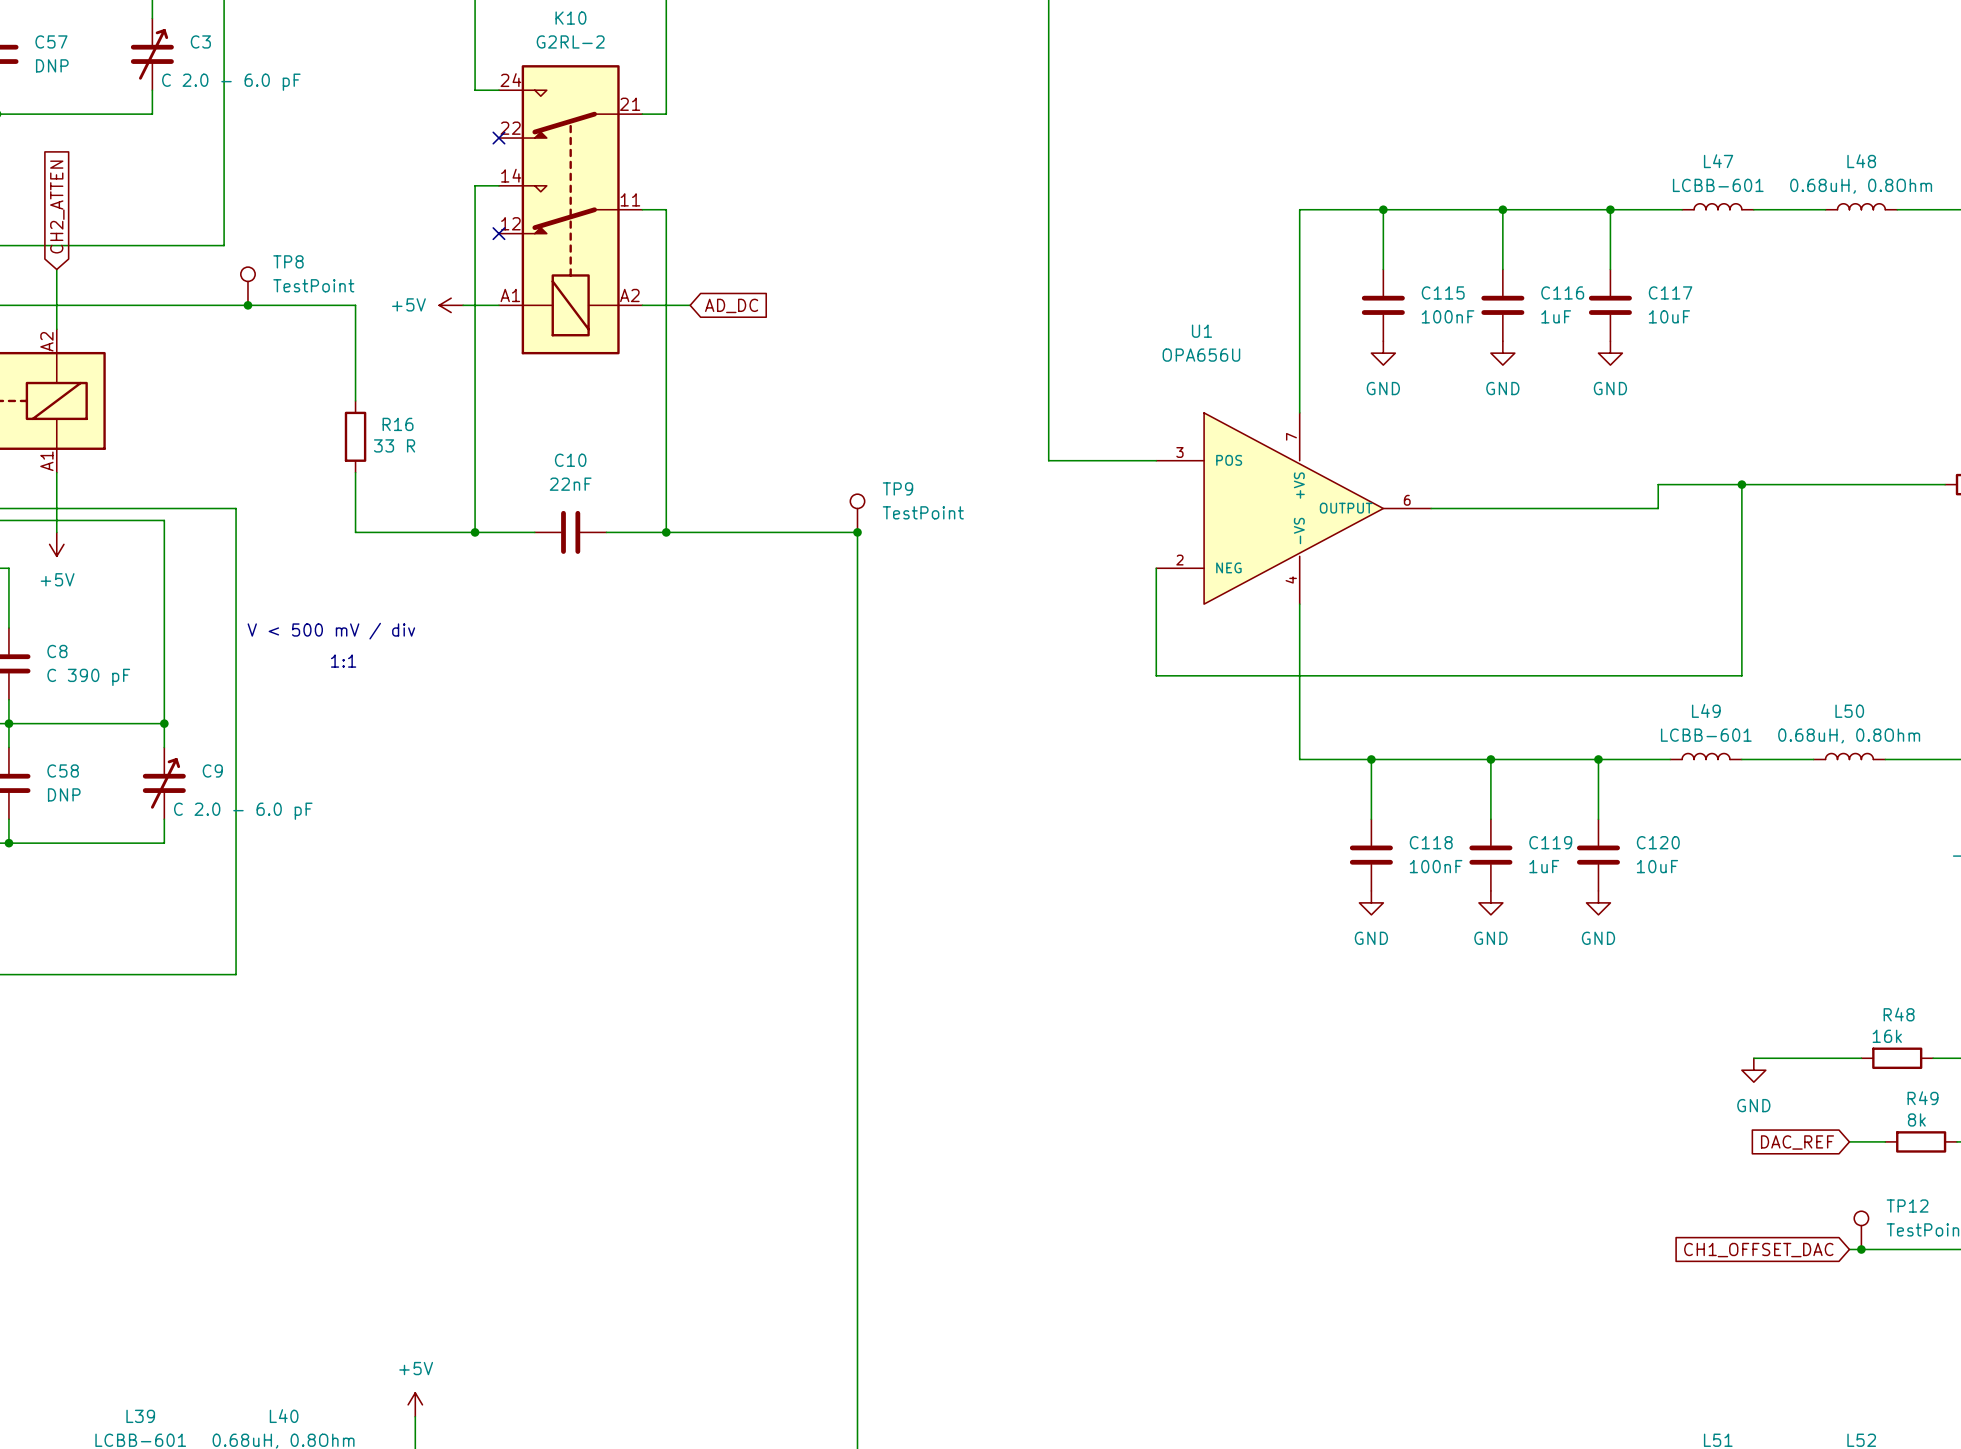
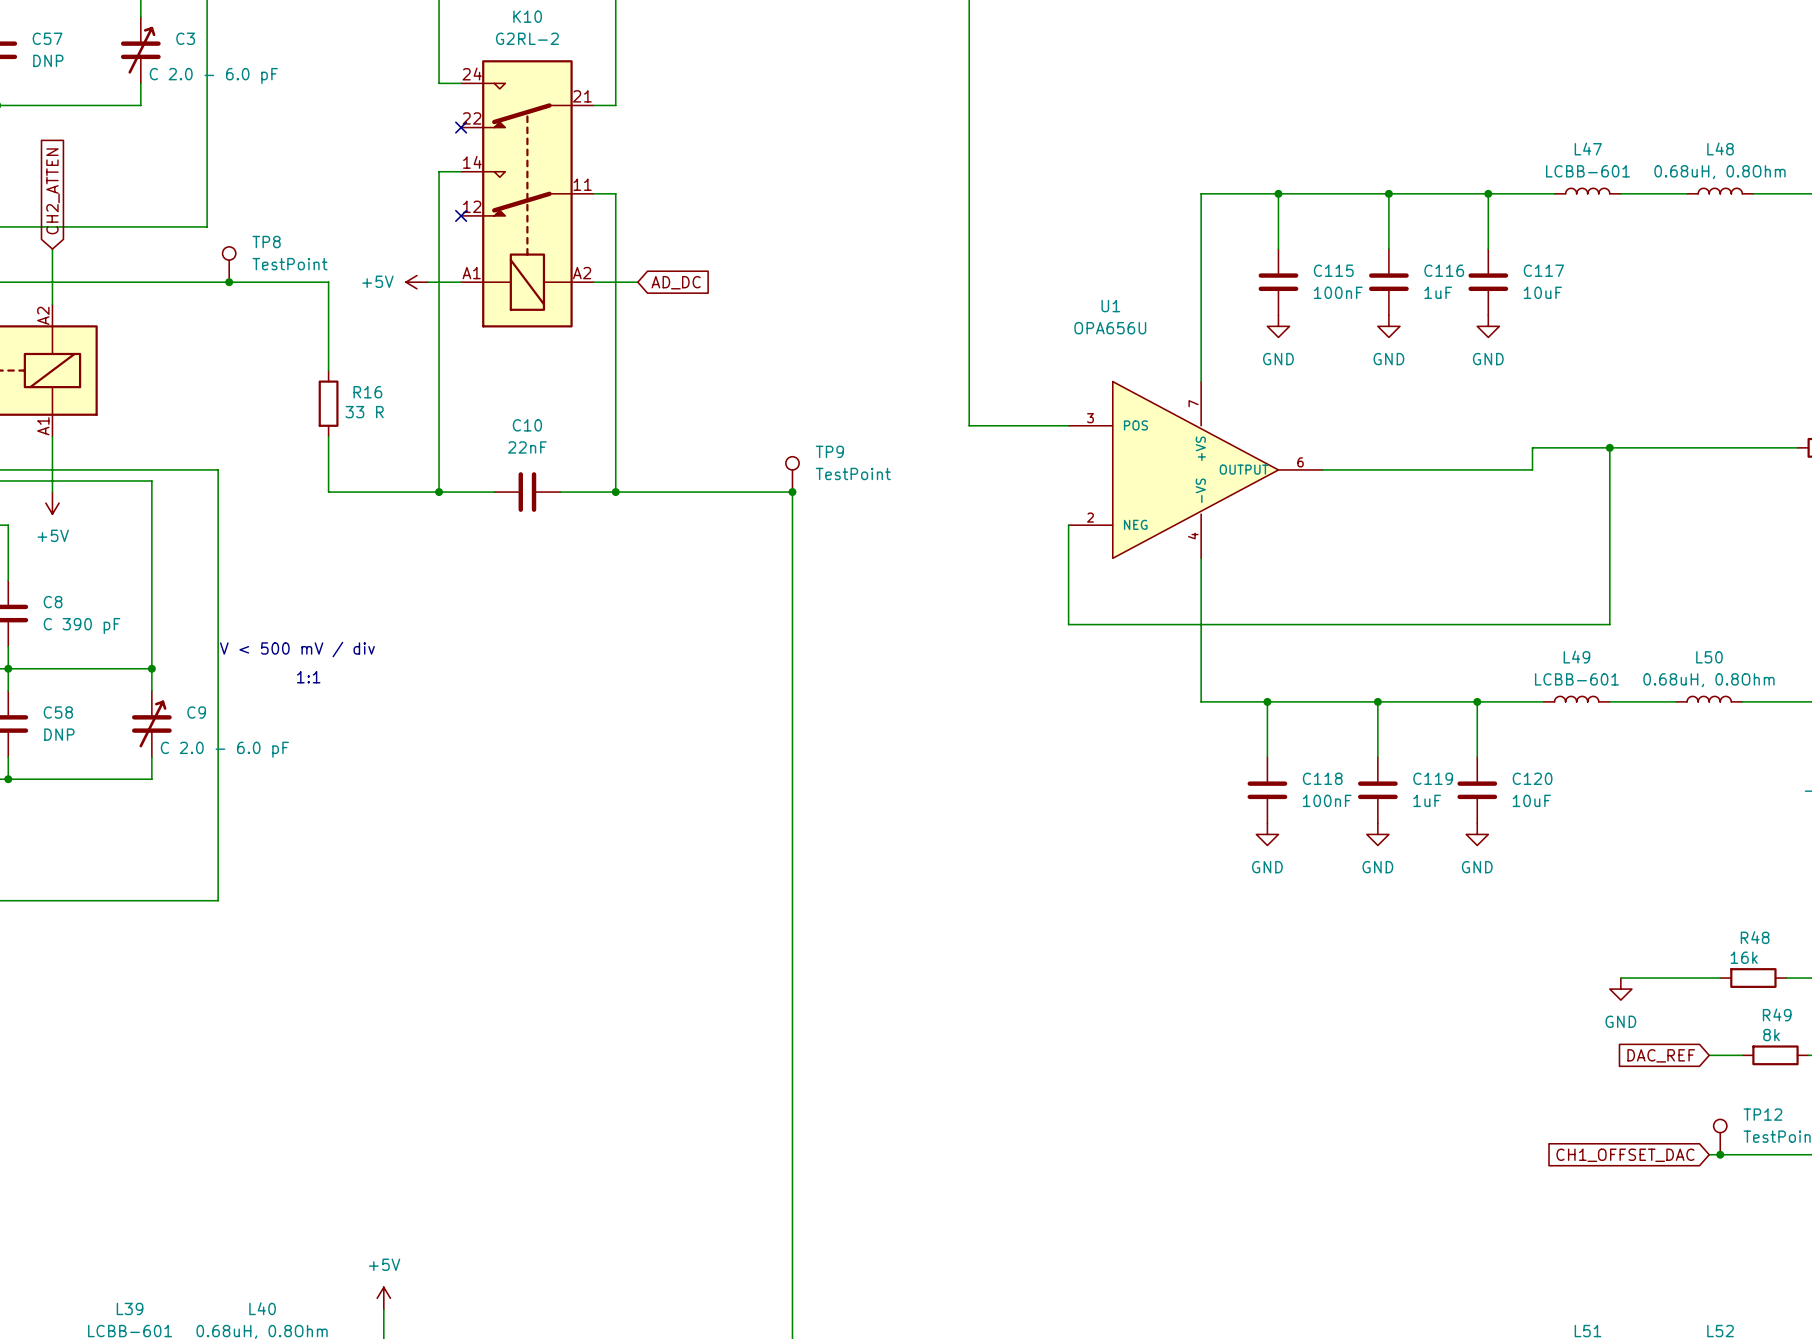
text position: V < 500 mV / div (331, 631) -> V < 500 mV / div (297, 649)
text position: 1:1 (343, 661) -> 1:1 (308, 677)

